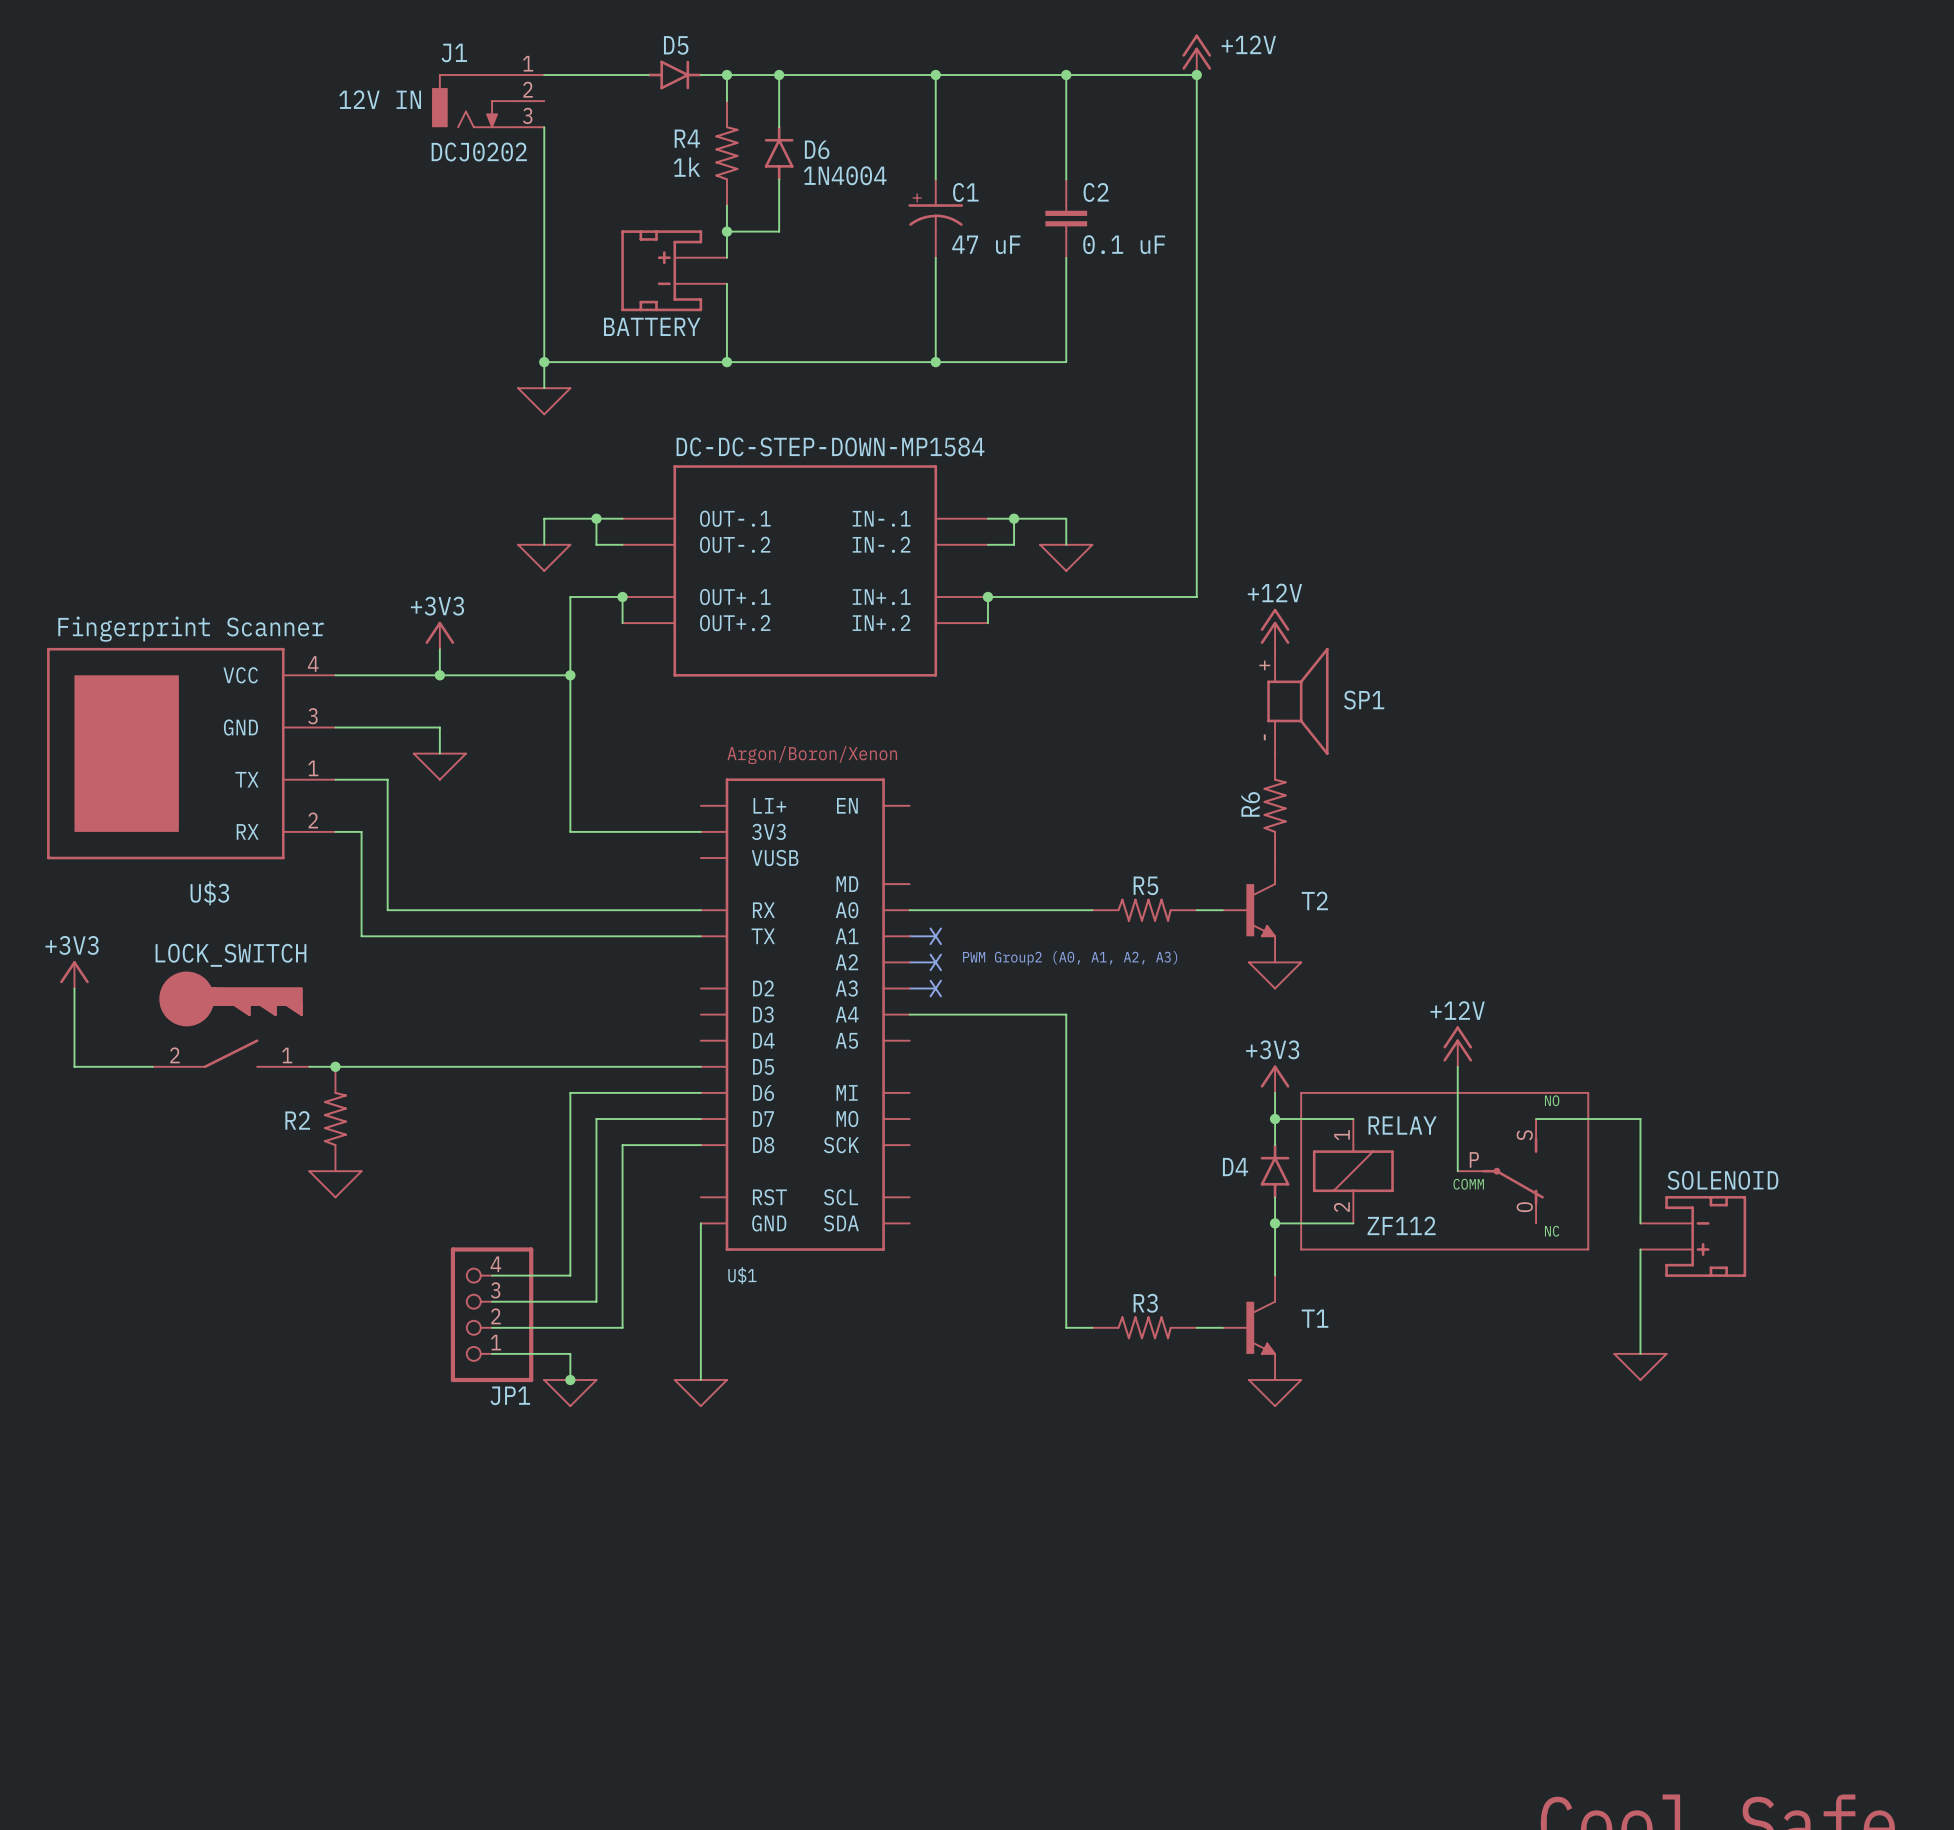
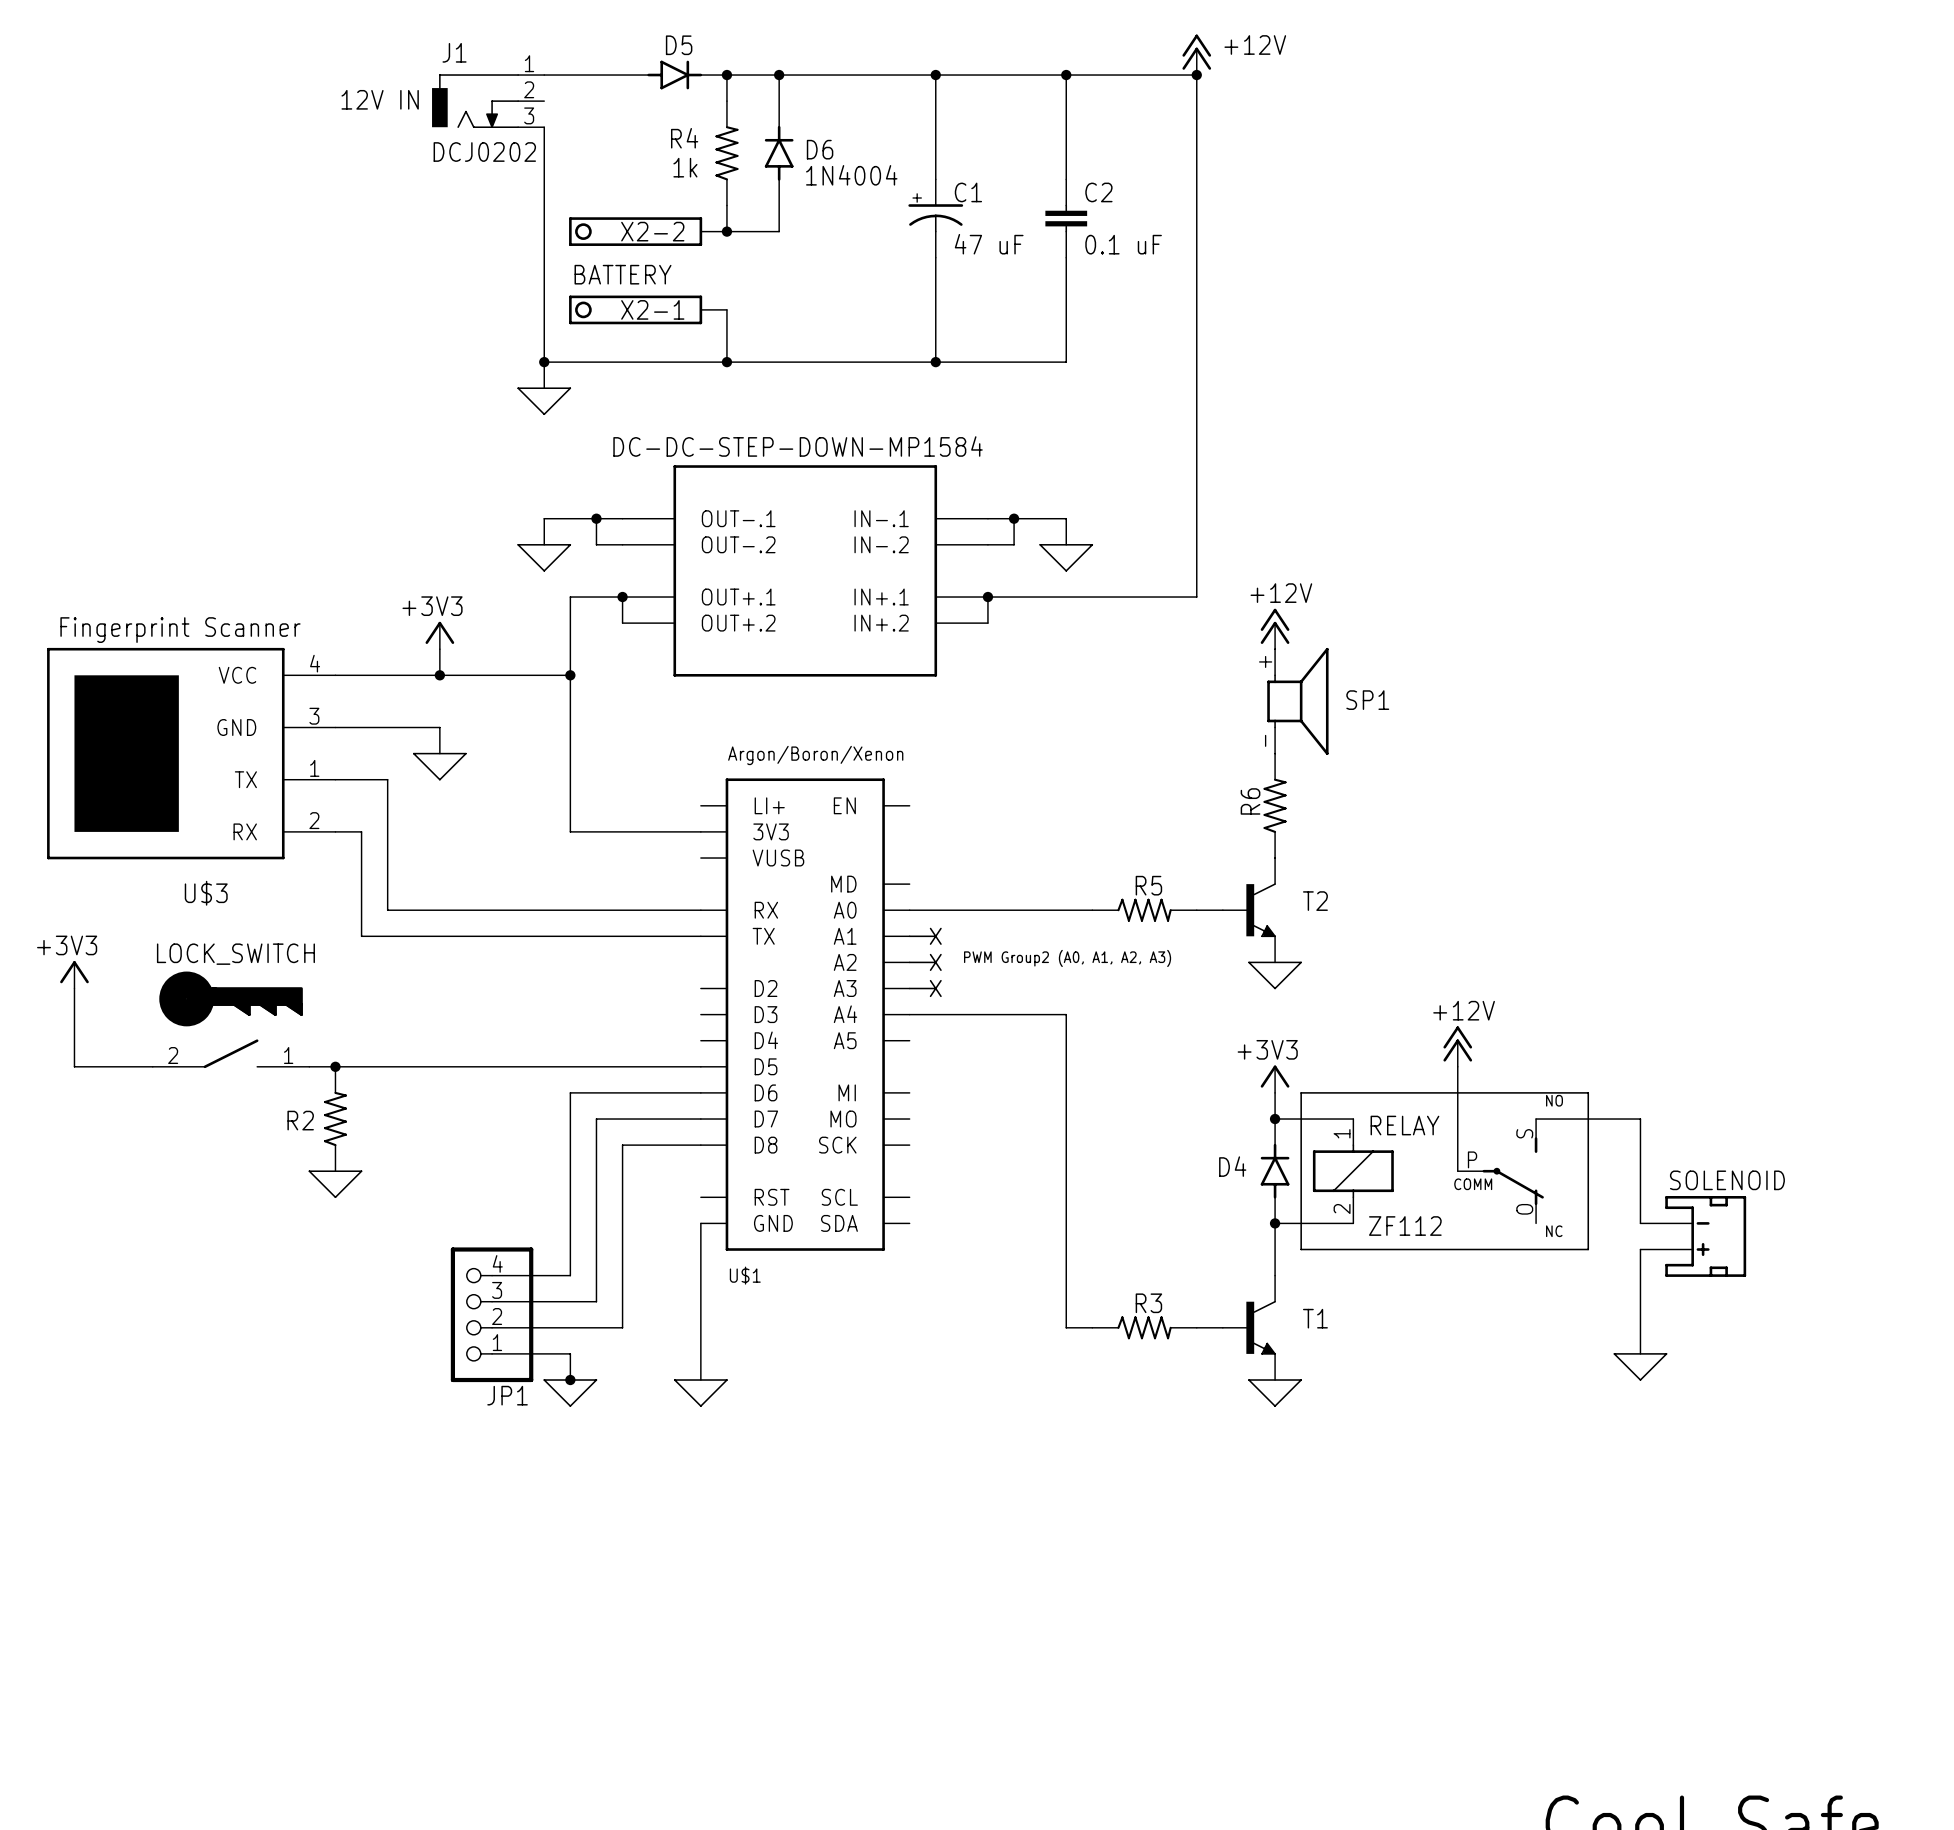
X2-2: none -> (648, 231)
wire: (726, 231) (726, 257) -> none
BATTERY: (674, 270) -> none
text: none -> BATTERY (623, 274)
wire: (726, 283) (726, 309) -> none
X2-1: none -> (648, 309)

